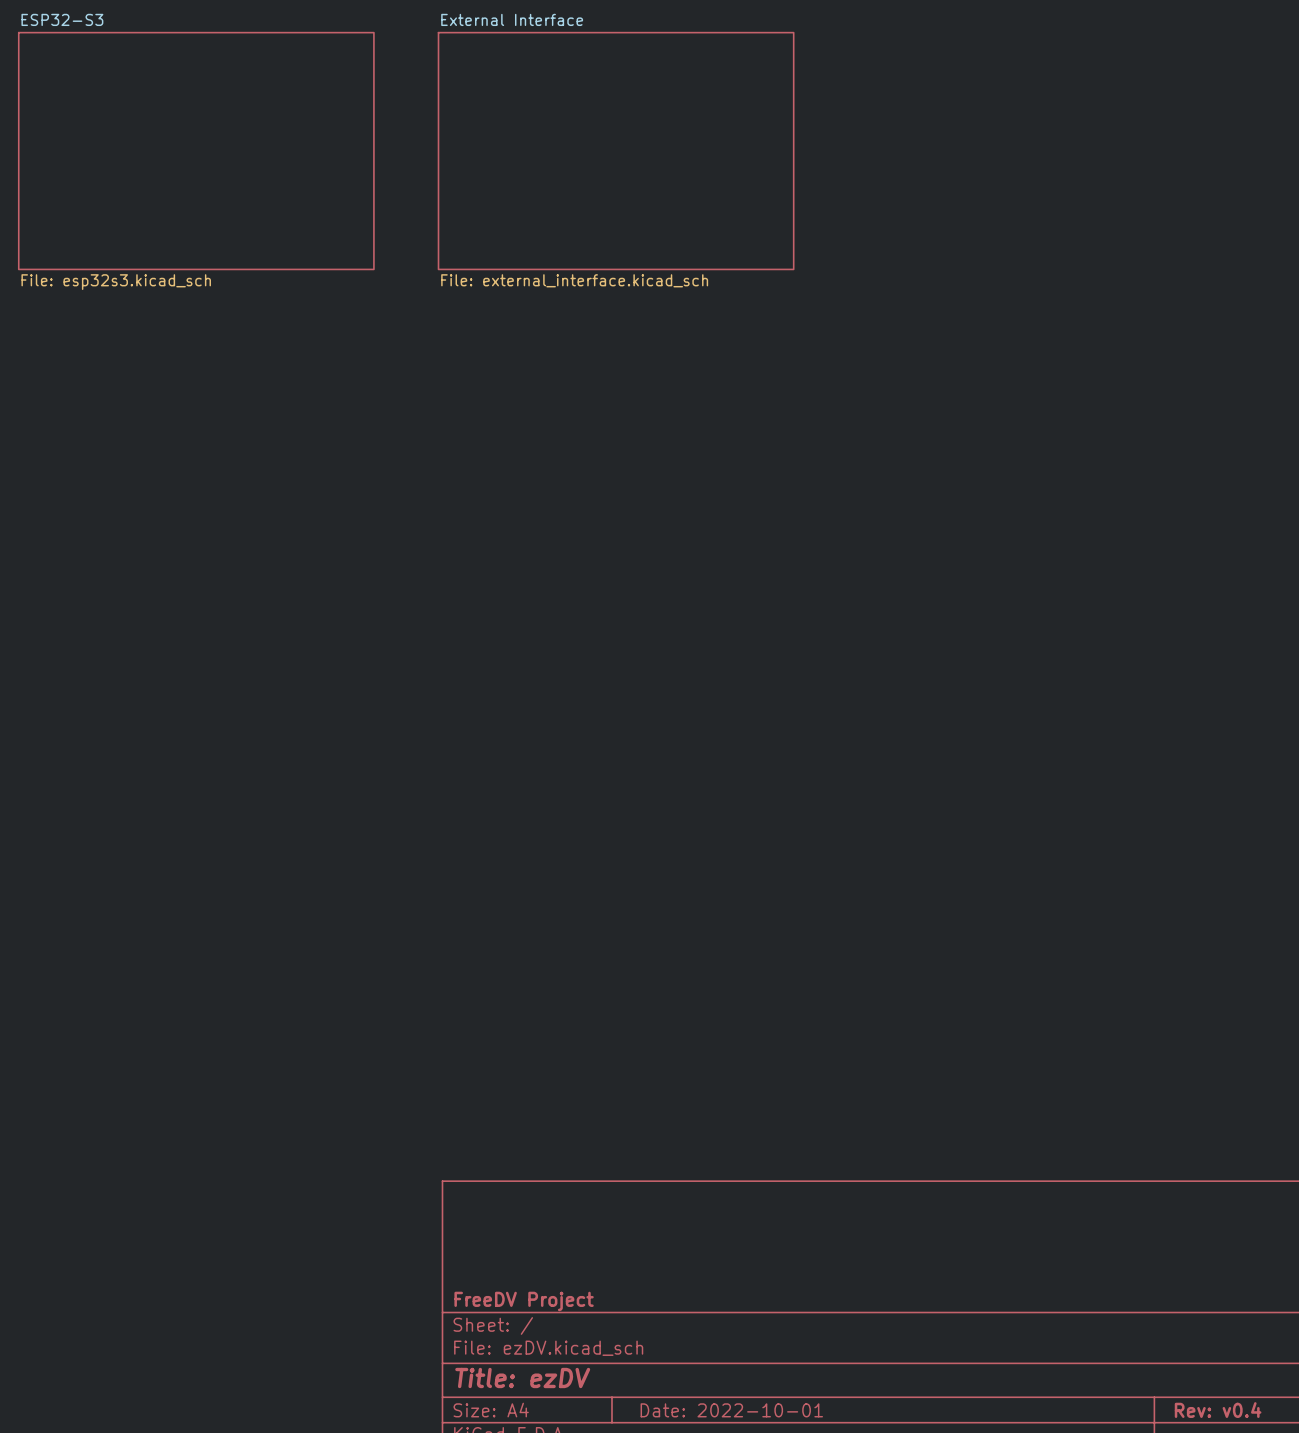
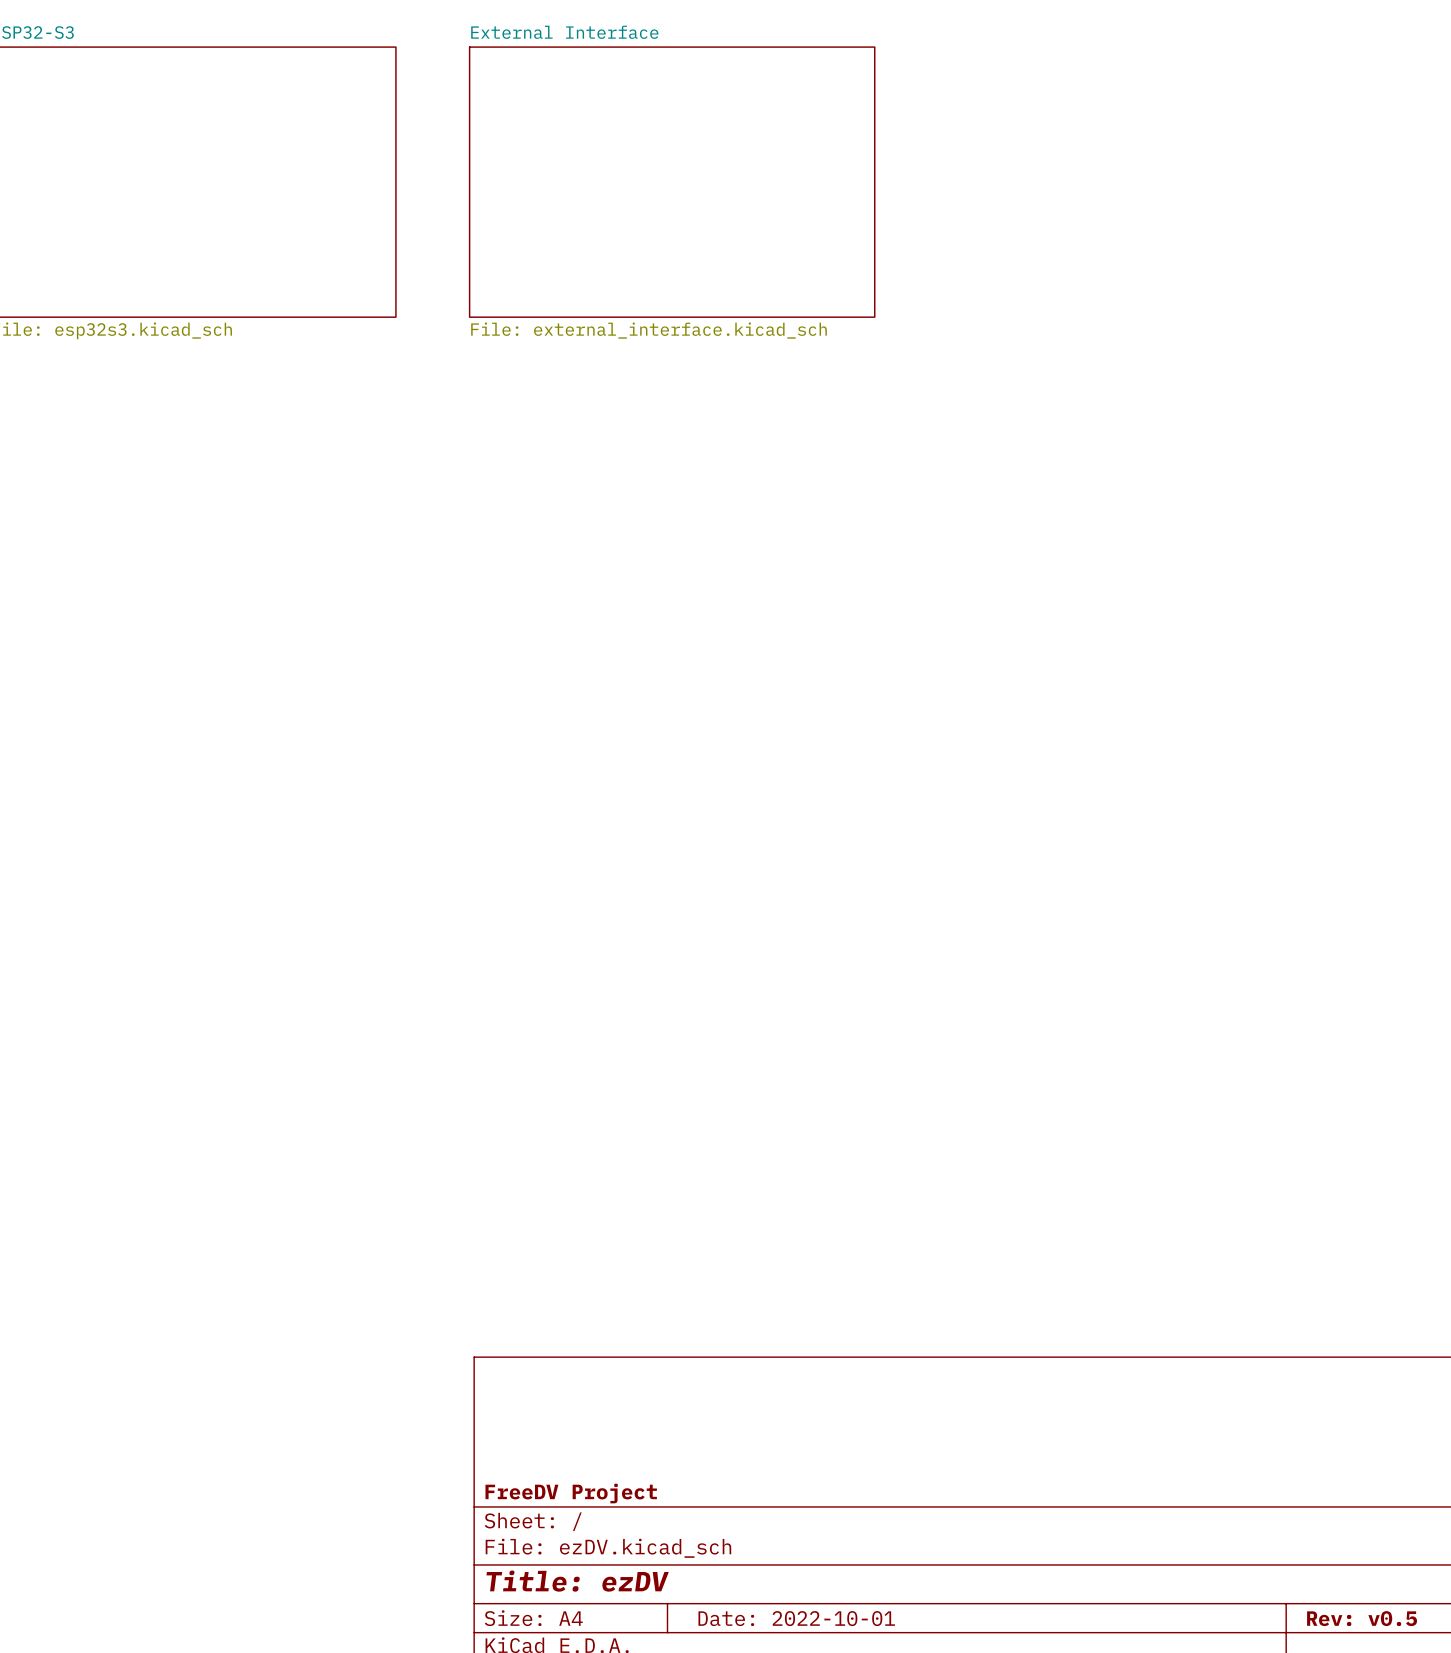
title block: Rev: v0.4 (1218, 1410) -> Rev: v0.5 (1362, 1618)

